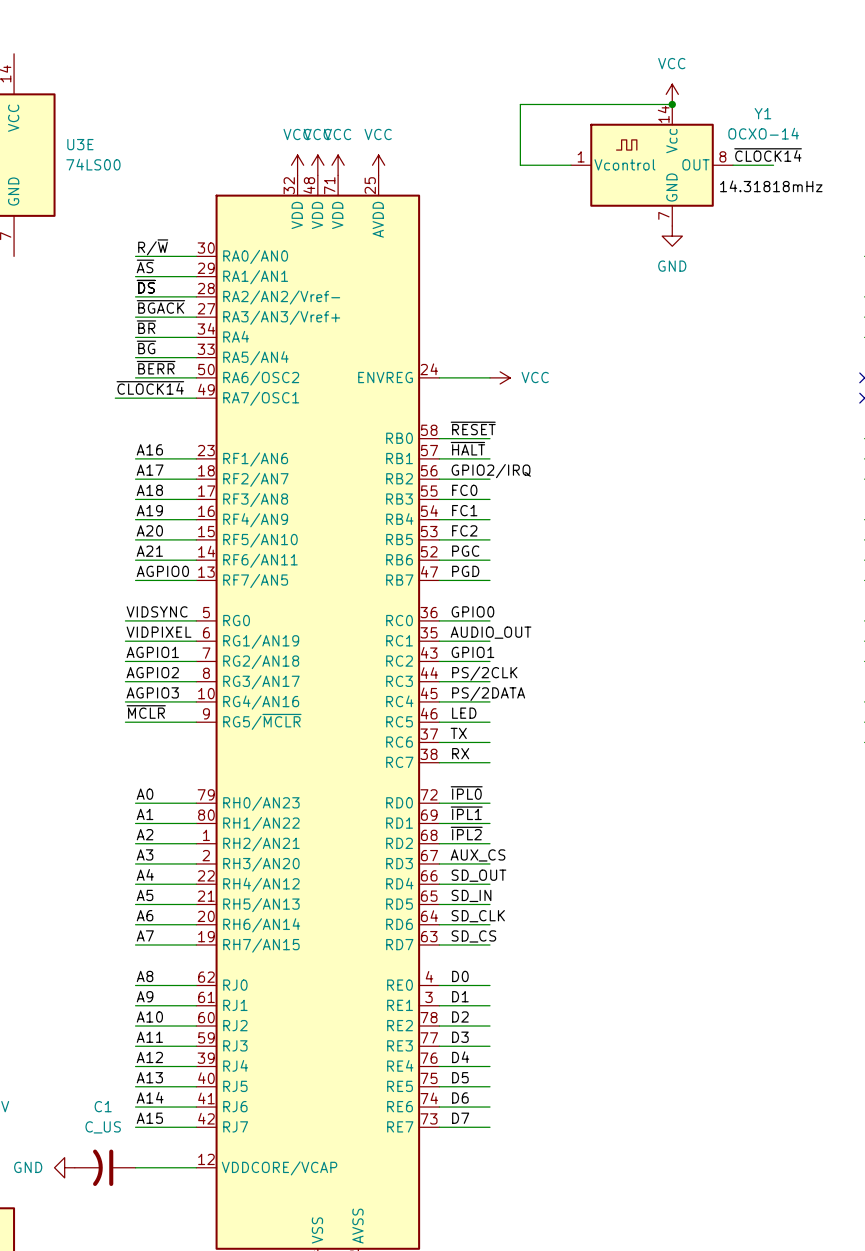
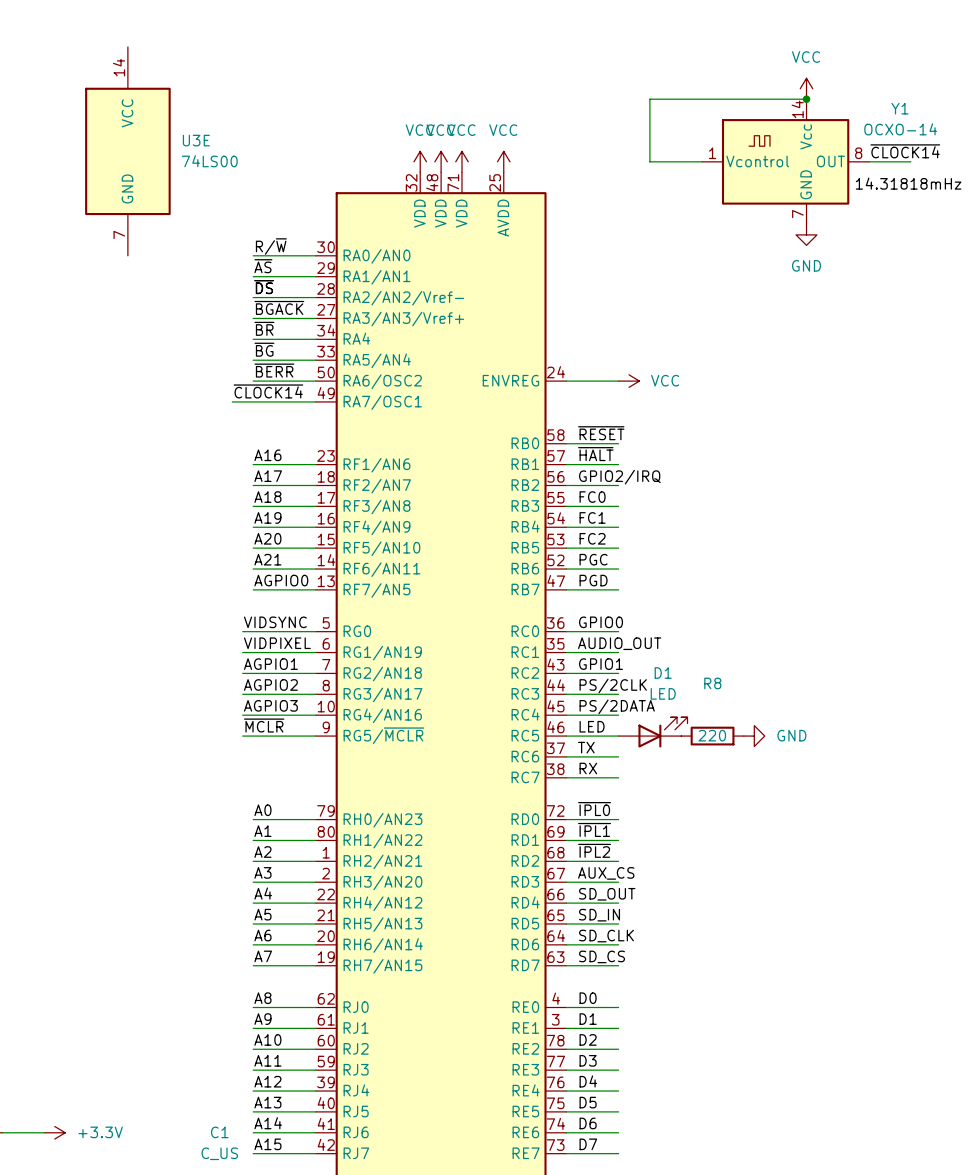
D1: none -> LED (653, 732)
R8: none -> 220 (712, 736)
power symbol: none -> GND (754, 736)

